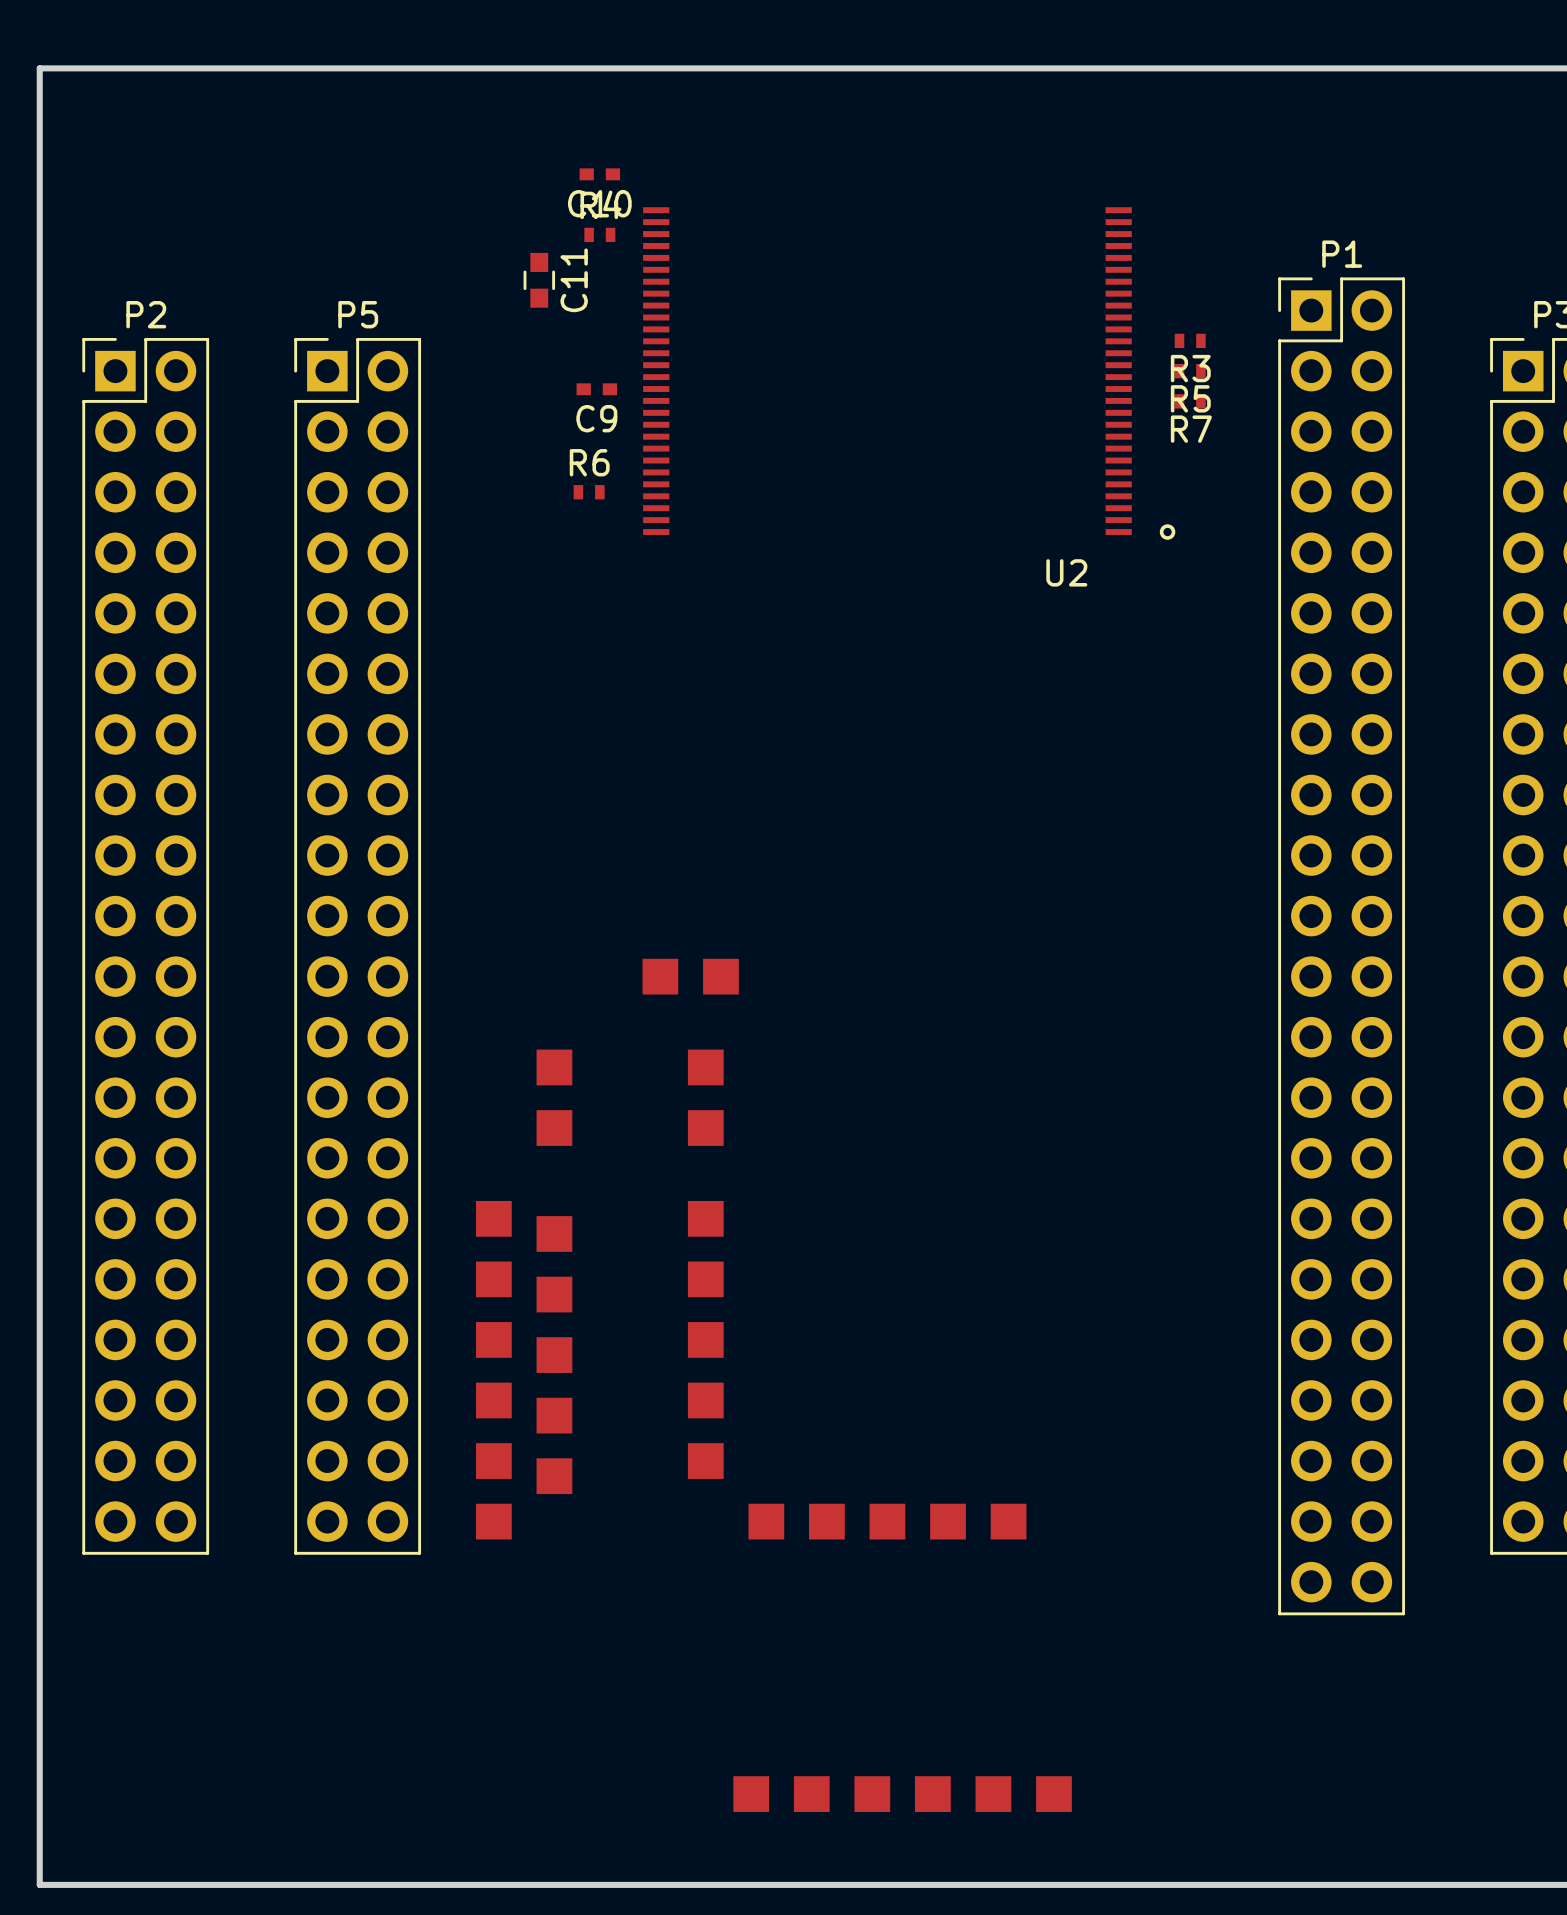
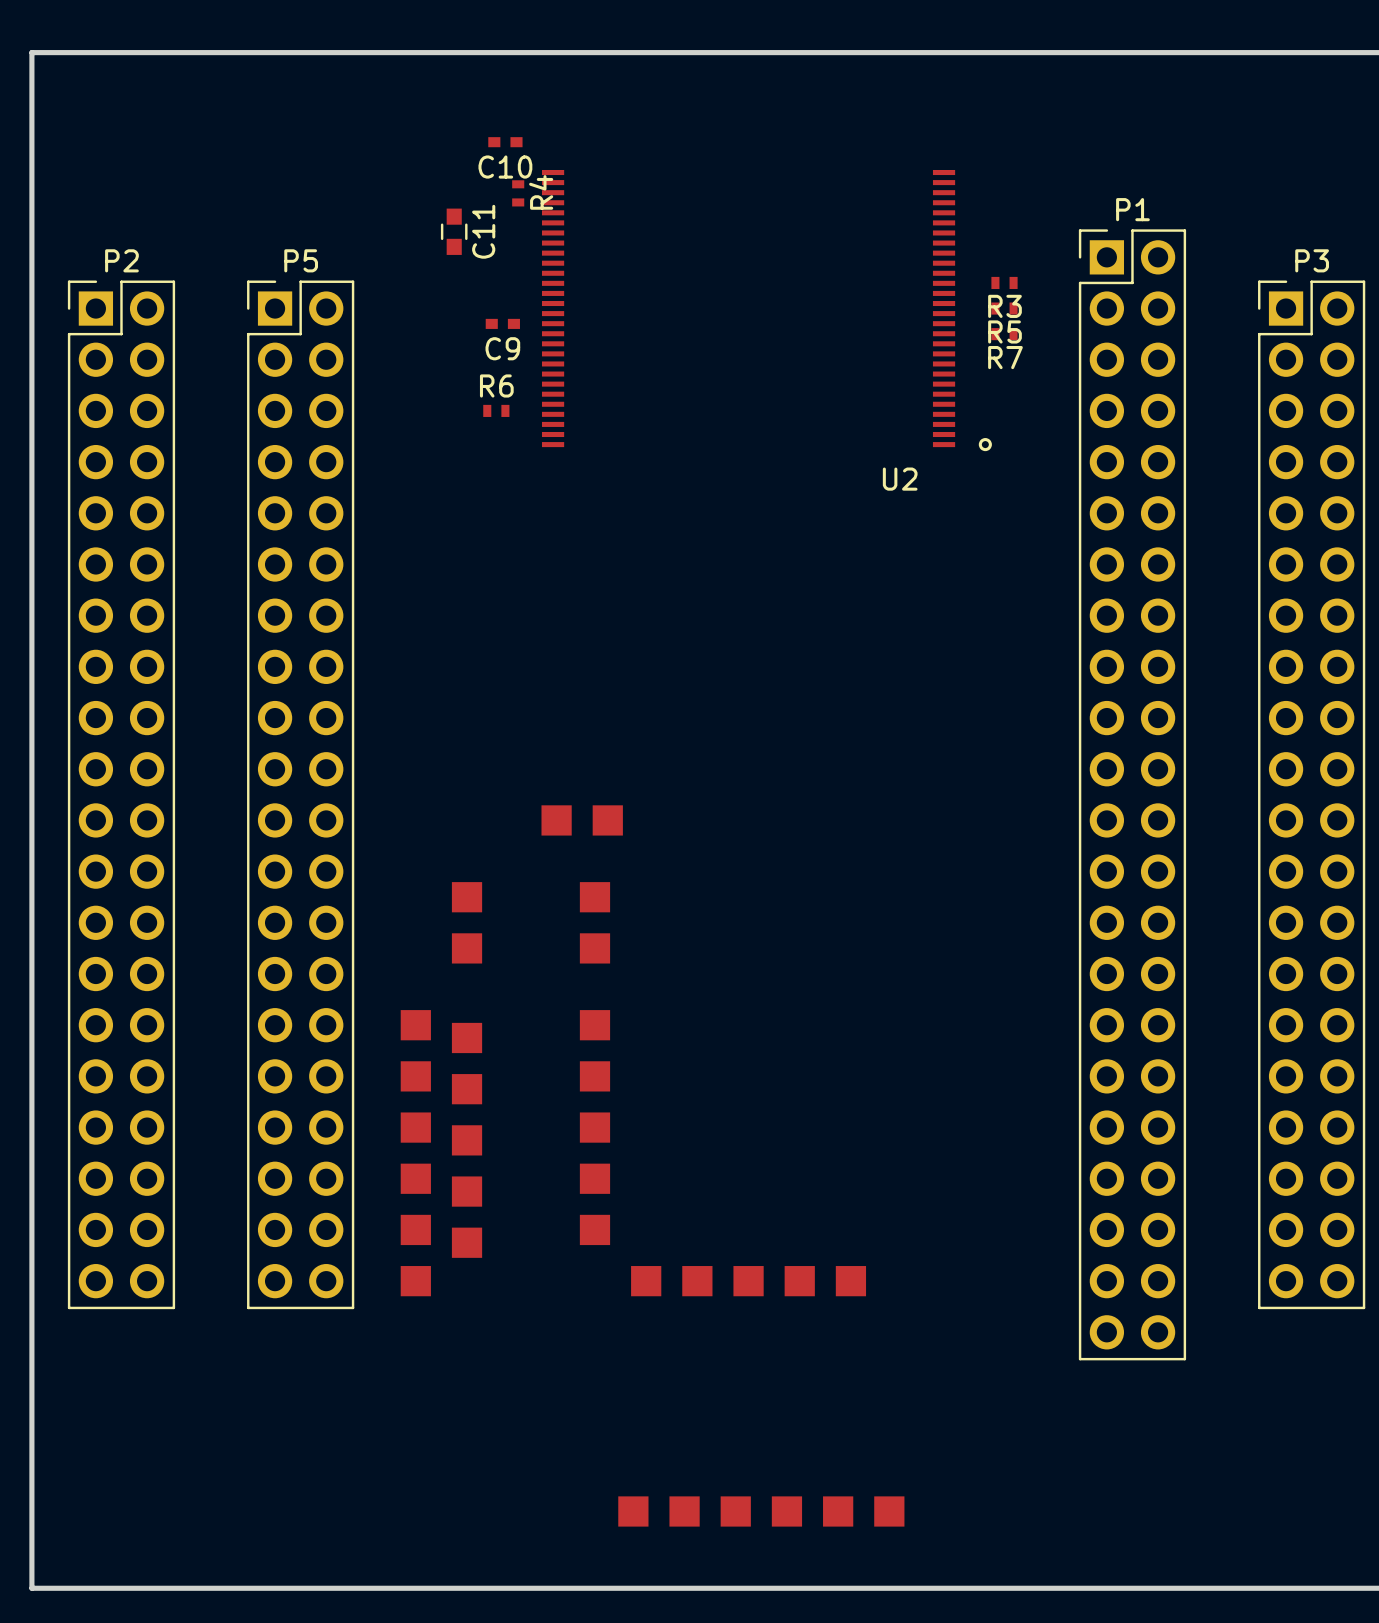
R4 rotation: 0° (599, 234) -> 90° clockwise (518, 193)

